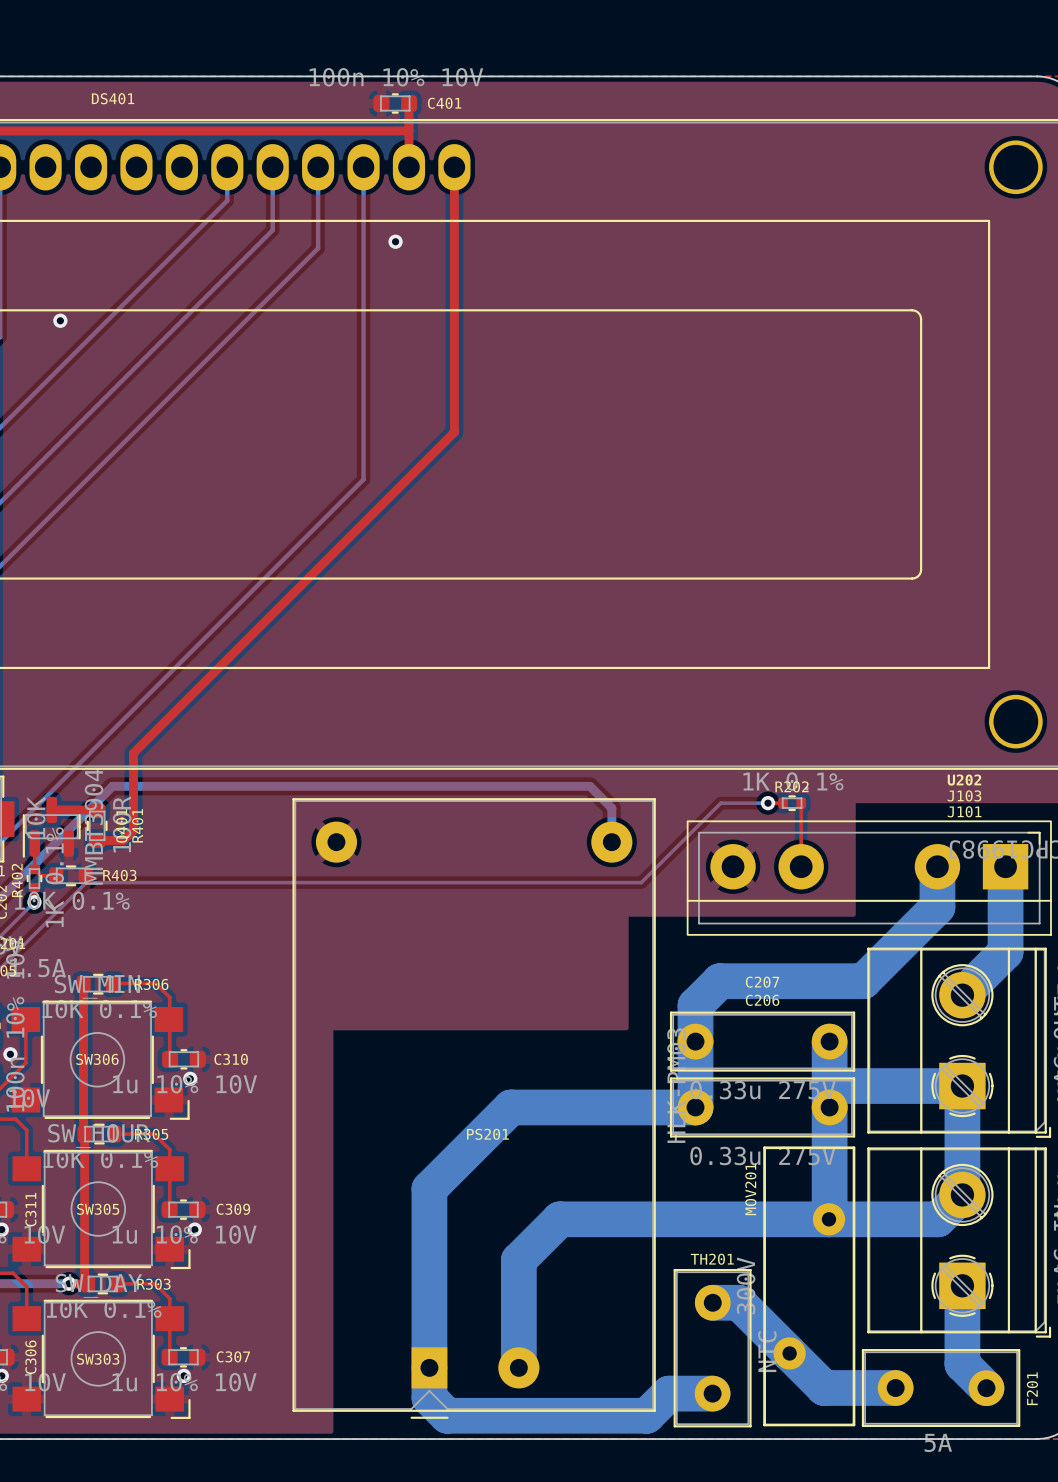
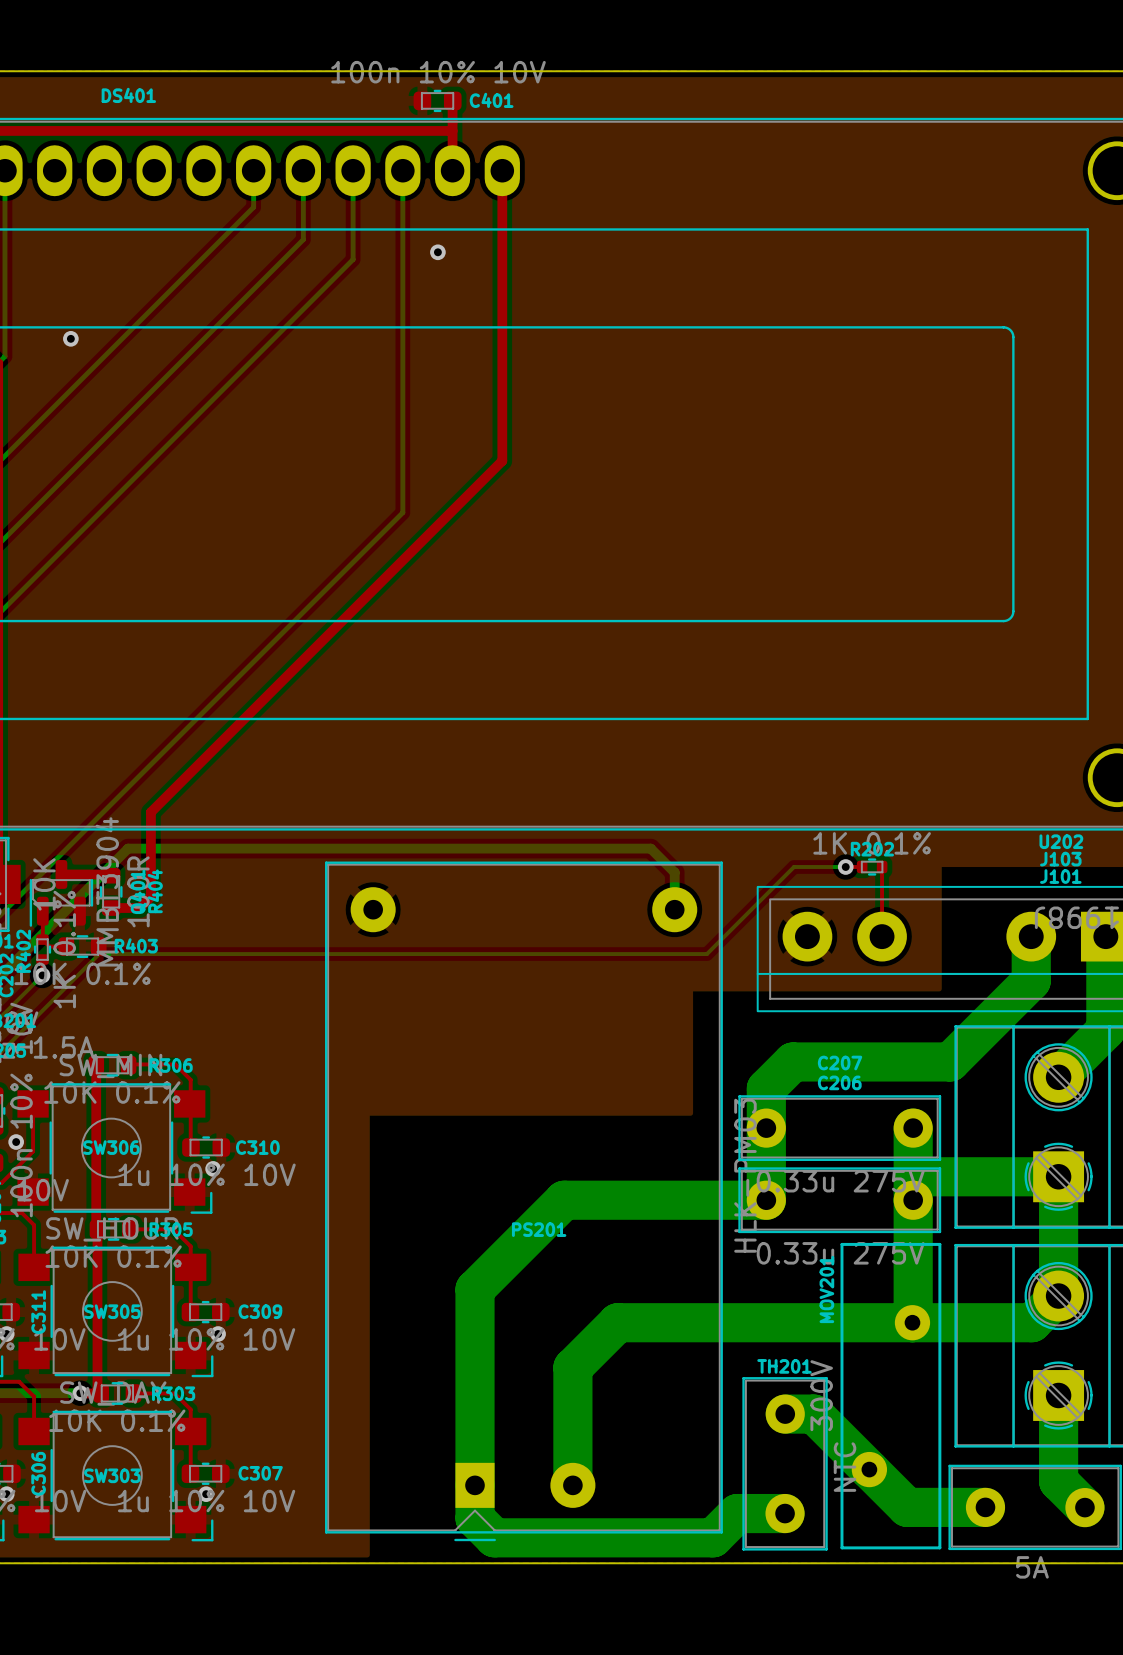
R401 name: R401 (137, 825) -> R404 (155, 891)

